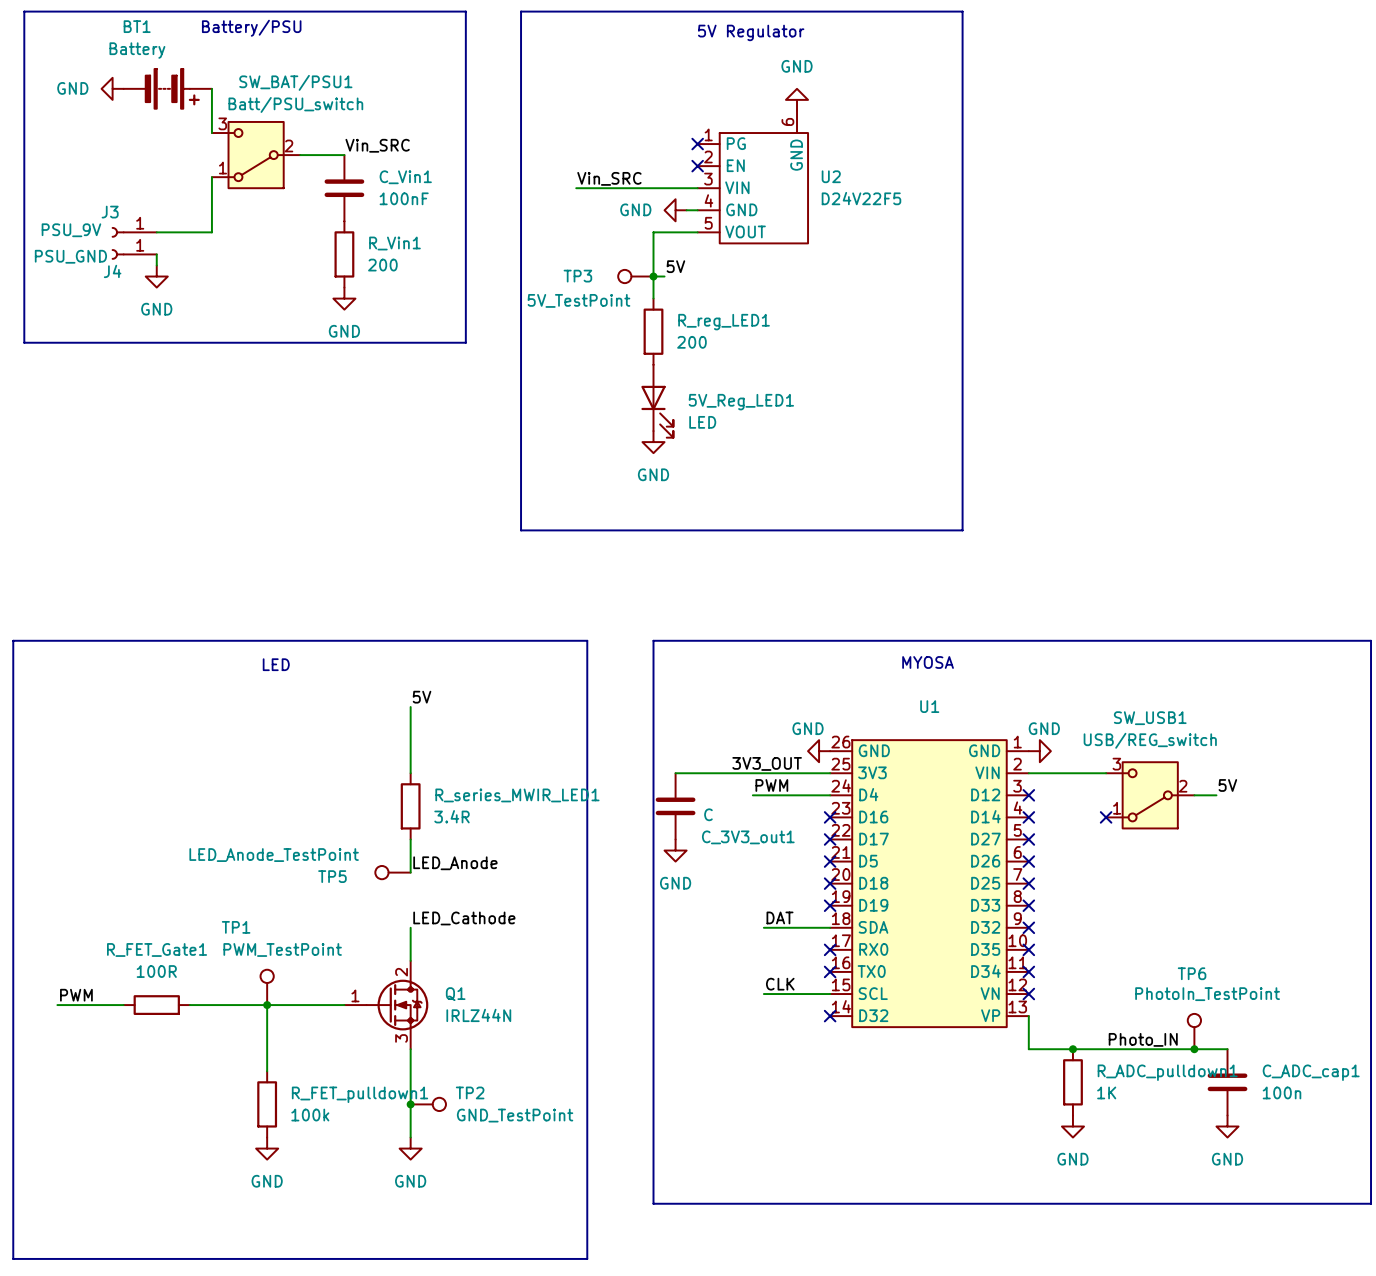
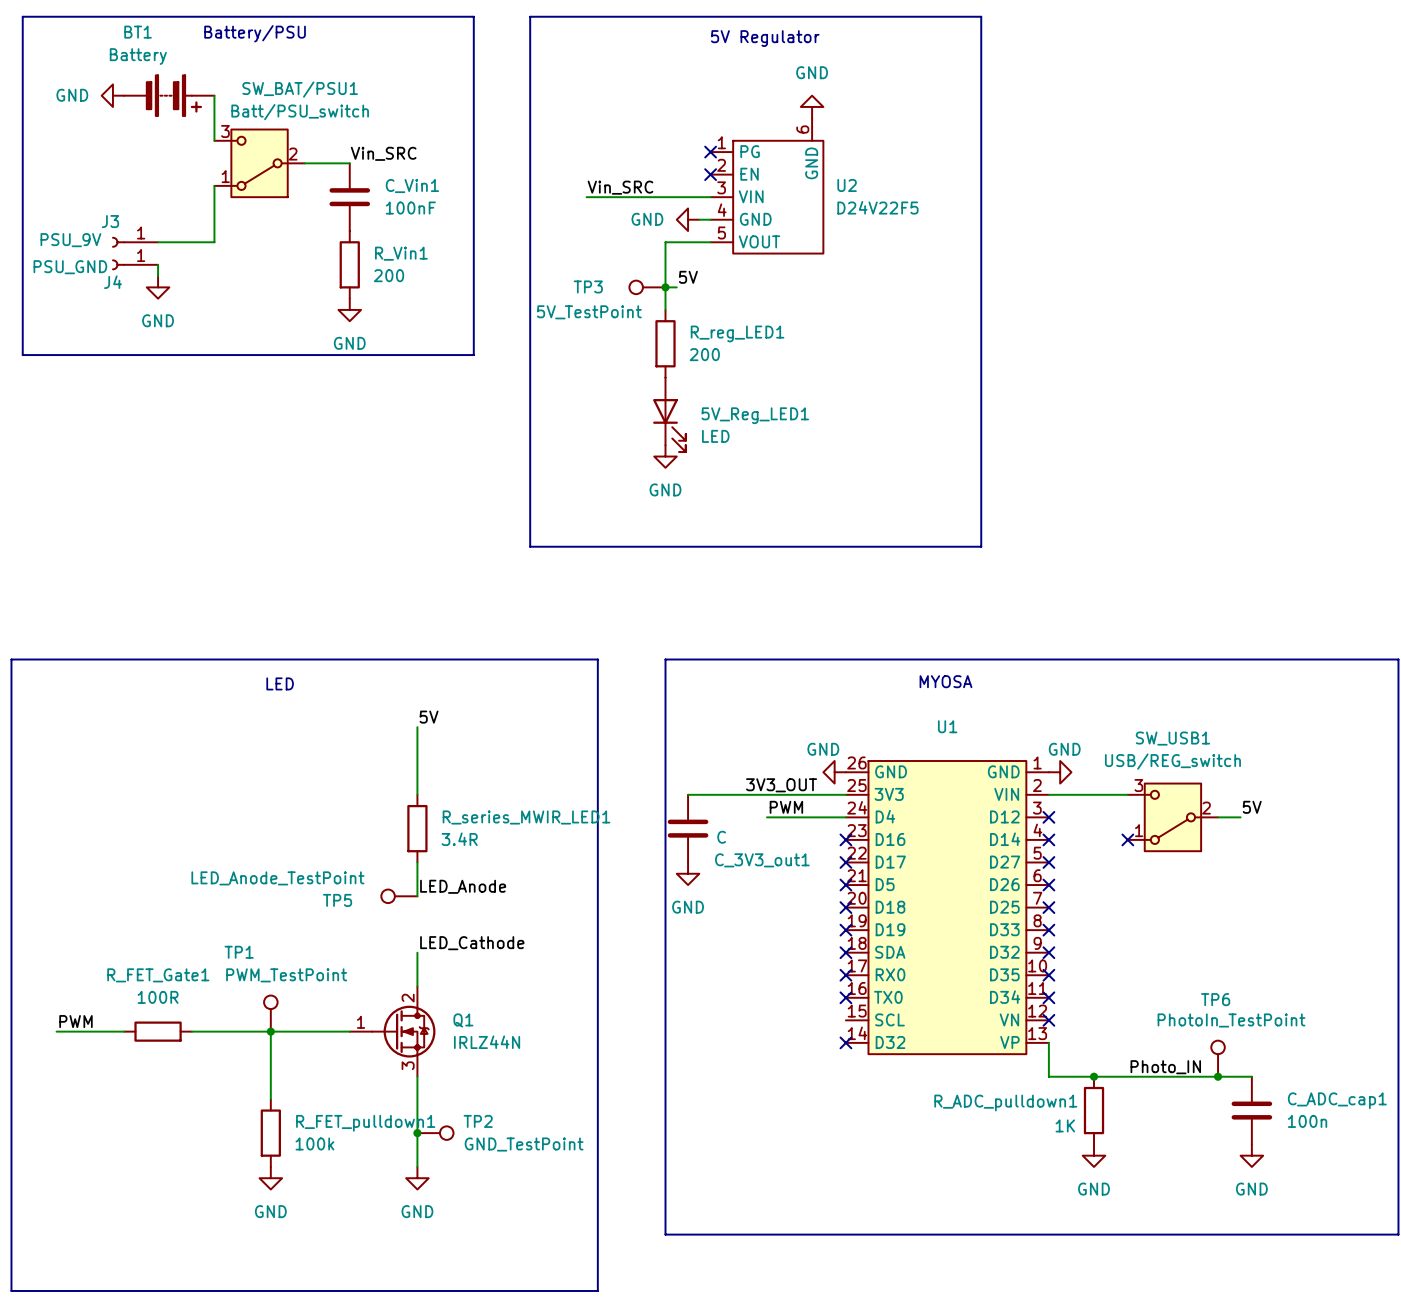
label: DAT (780, 917) -> none
wire: (763, 927) (830, 927) -> none
no-connect mark: none -> (845, 952)
label: CLK (780, 984) -> none
wire: (763, 994) (830, 994) -> none
R_ADC_pulldown1 name position: R_ADC_pulldown1 (1167, 1072) -> R_ADC_pulldown1 (1005, 1103)
R_ADC_pulldown1 value position: 1K (1106, 1092) -> 1K (1065, 1125)

